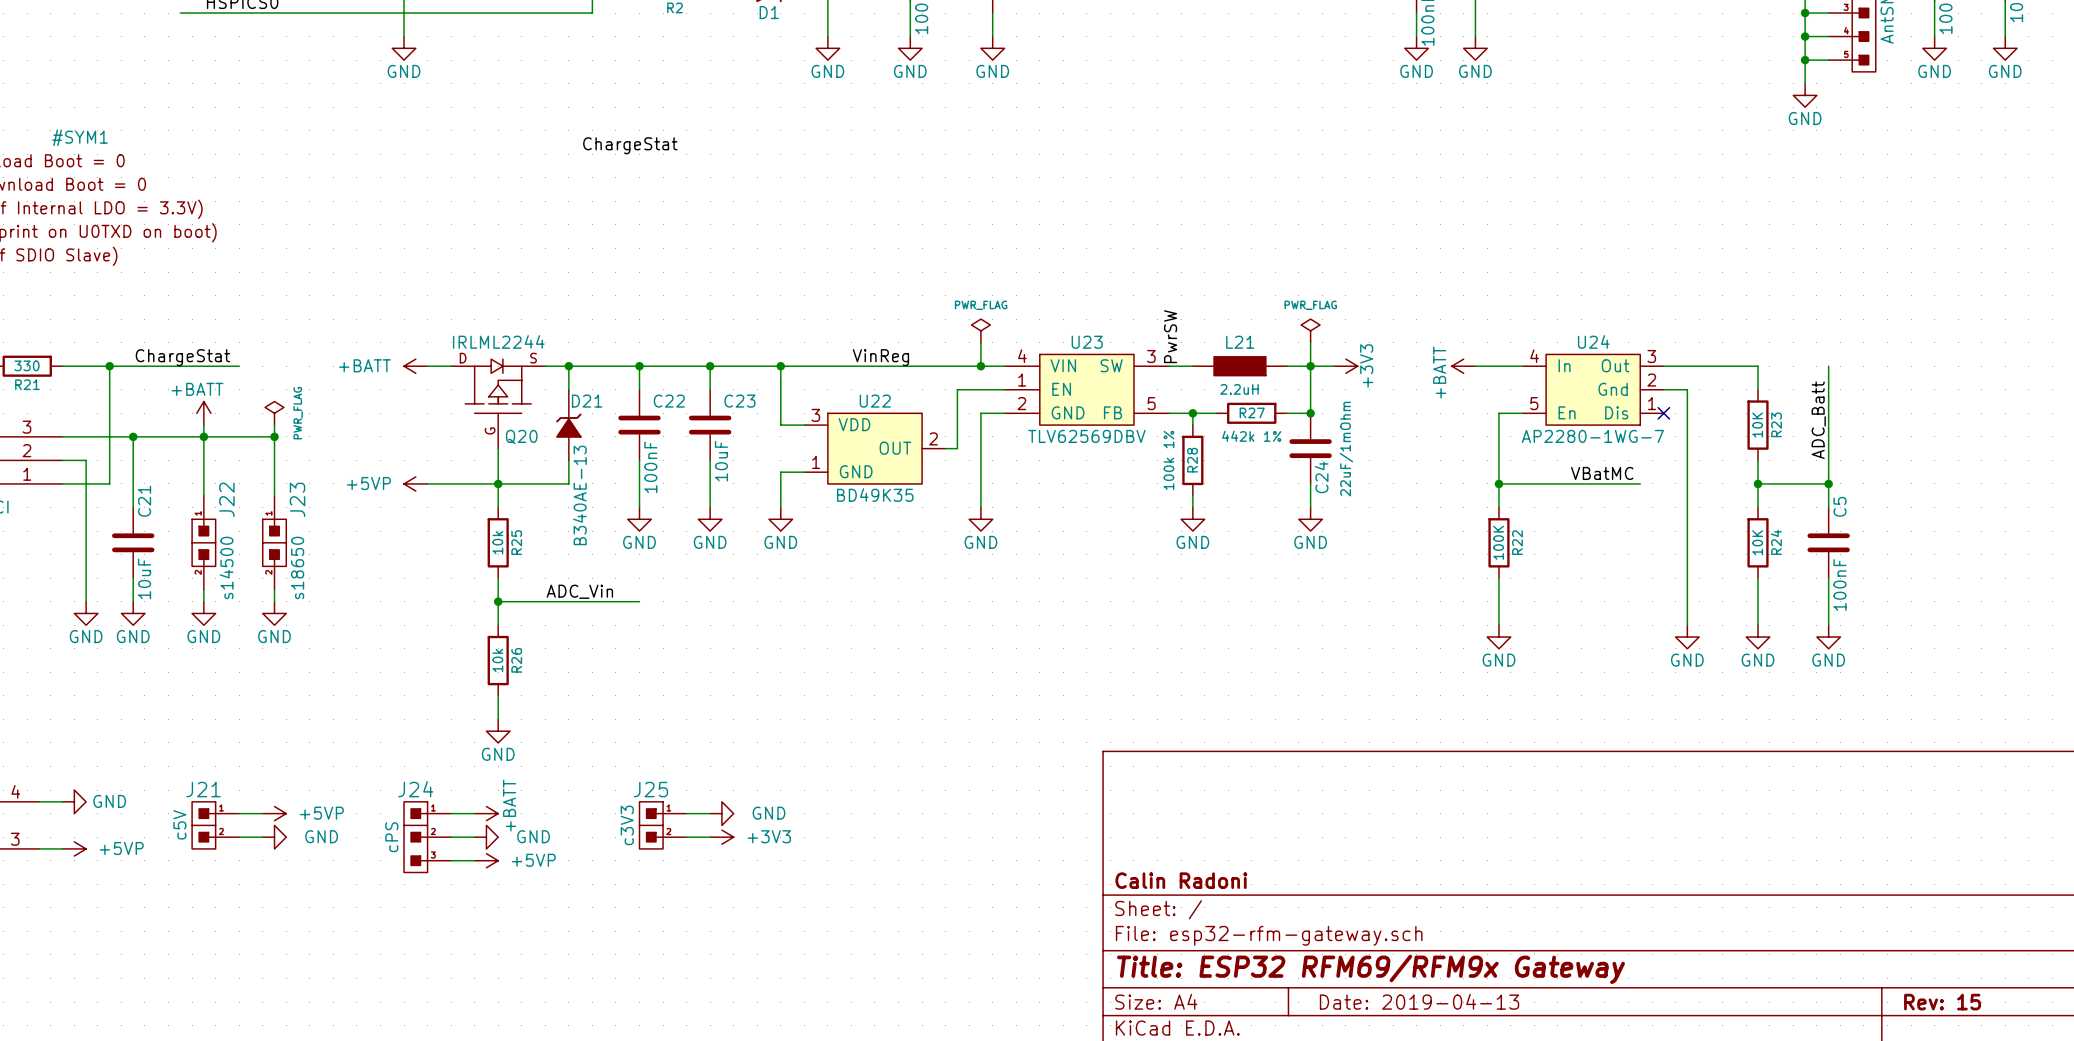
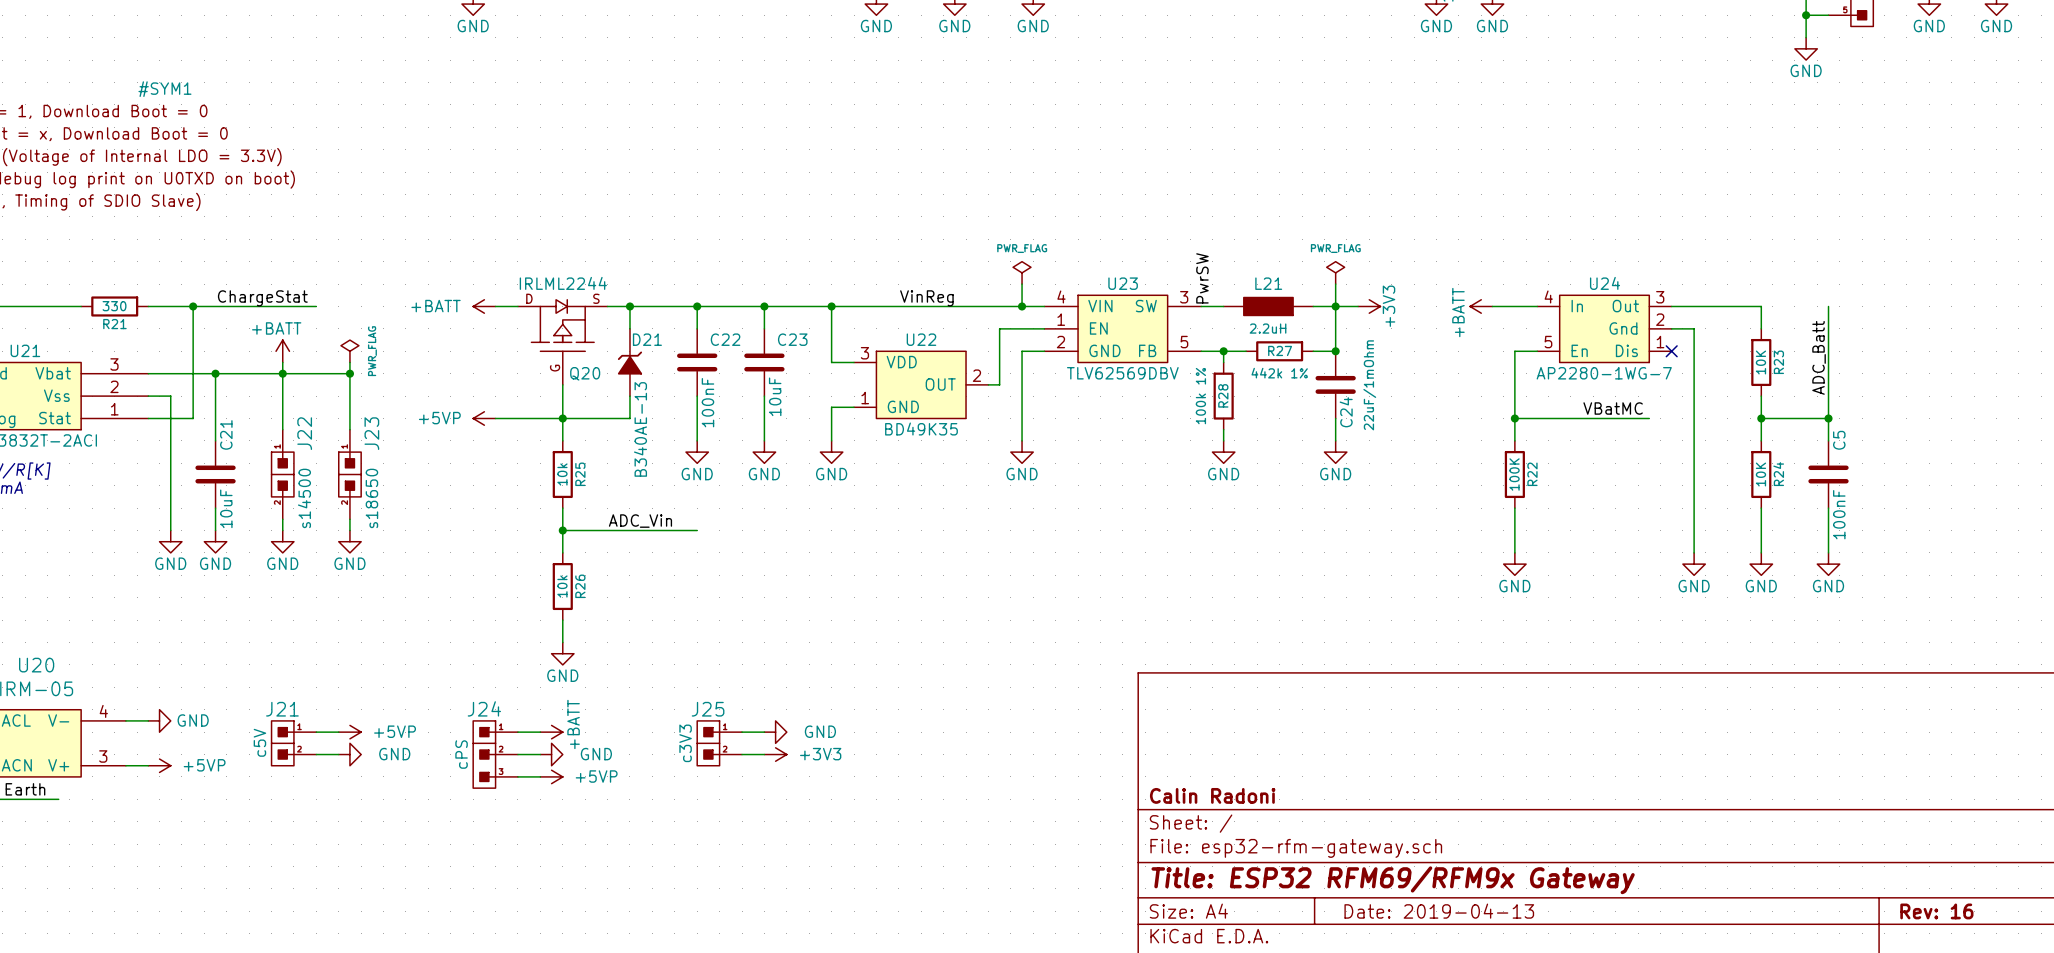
label: ChargeStat (630, 145) -> none
title block: Rev: 15 (1942, 1002) -> Rev: 16 (1936, 911)

